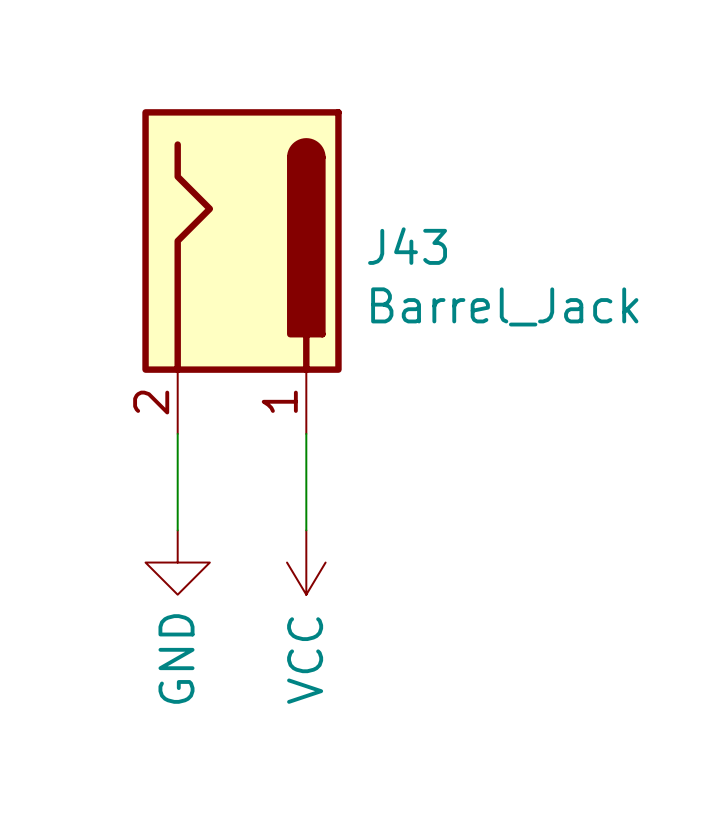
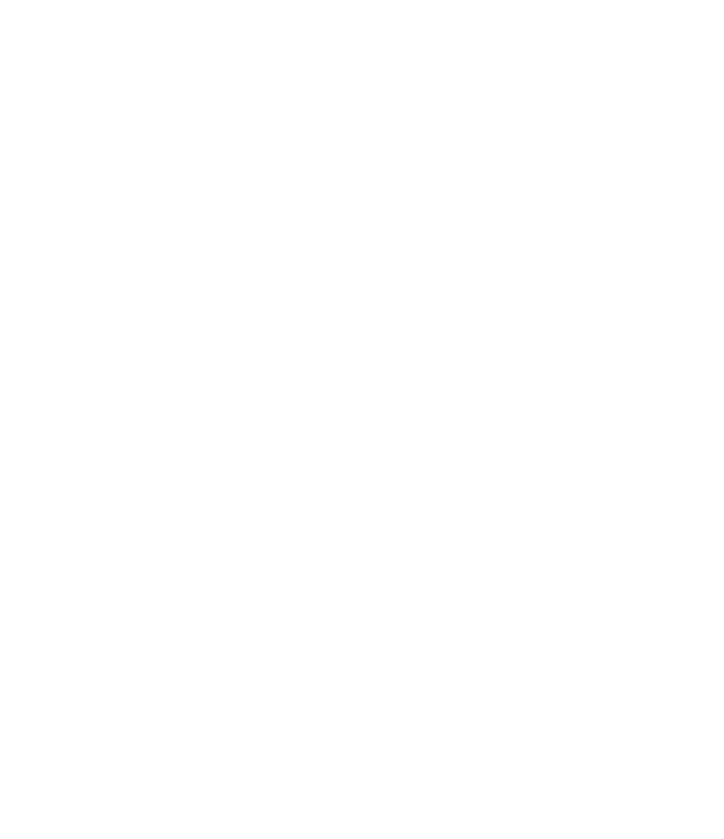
J43: Barrel_Jack (242, 271) -> none
wire: (177, 433) (177, 530) -> none
wire: (306, 433) (306, 530) -> none
power symbol: GND (177, 562) -> none
power symbol: VCC (306, 562) -> none

